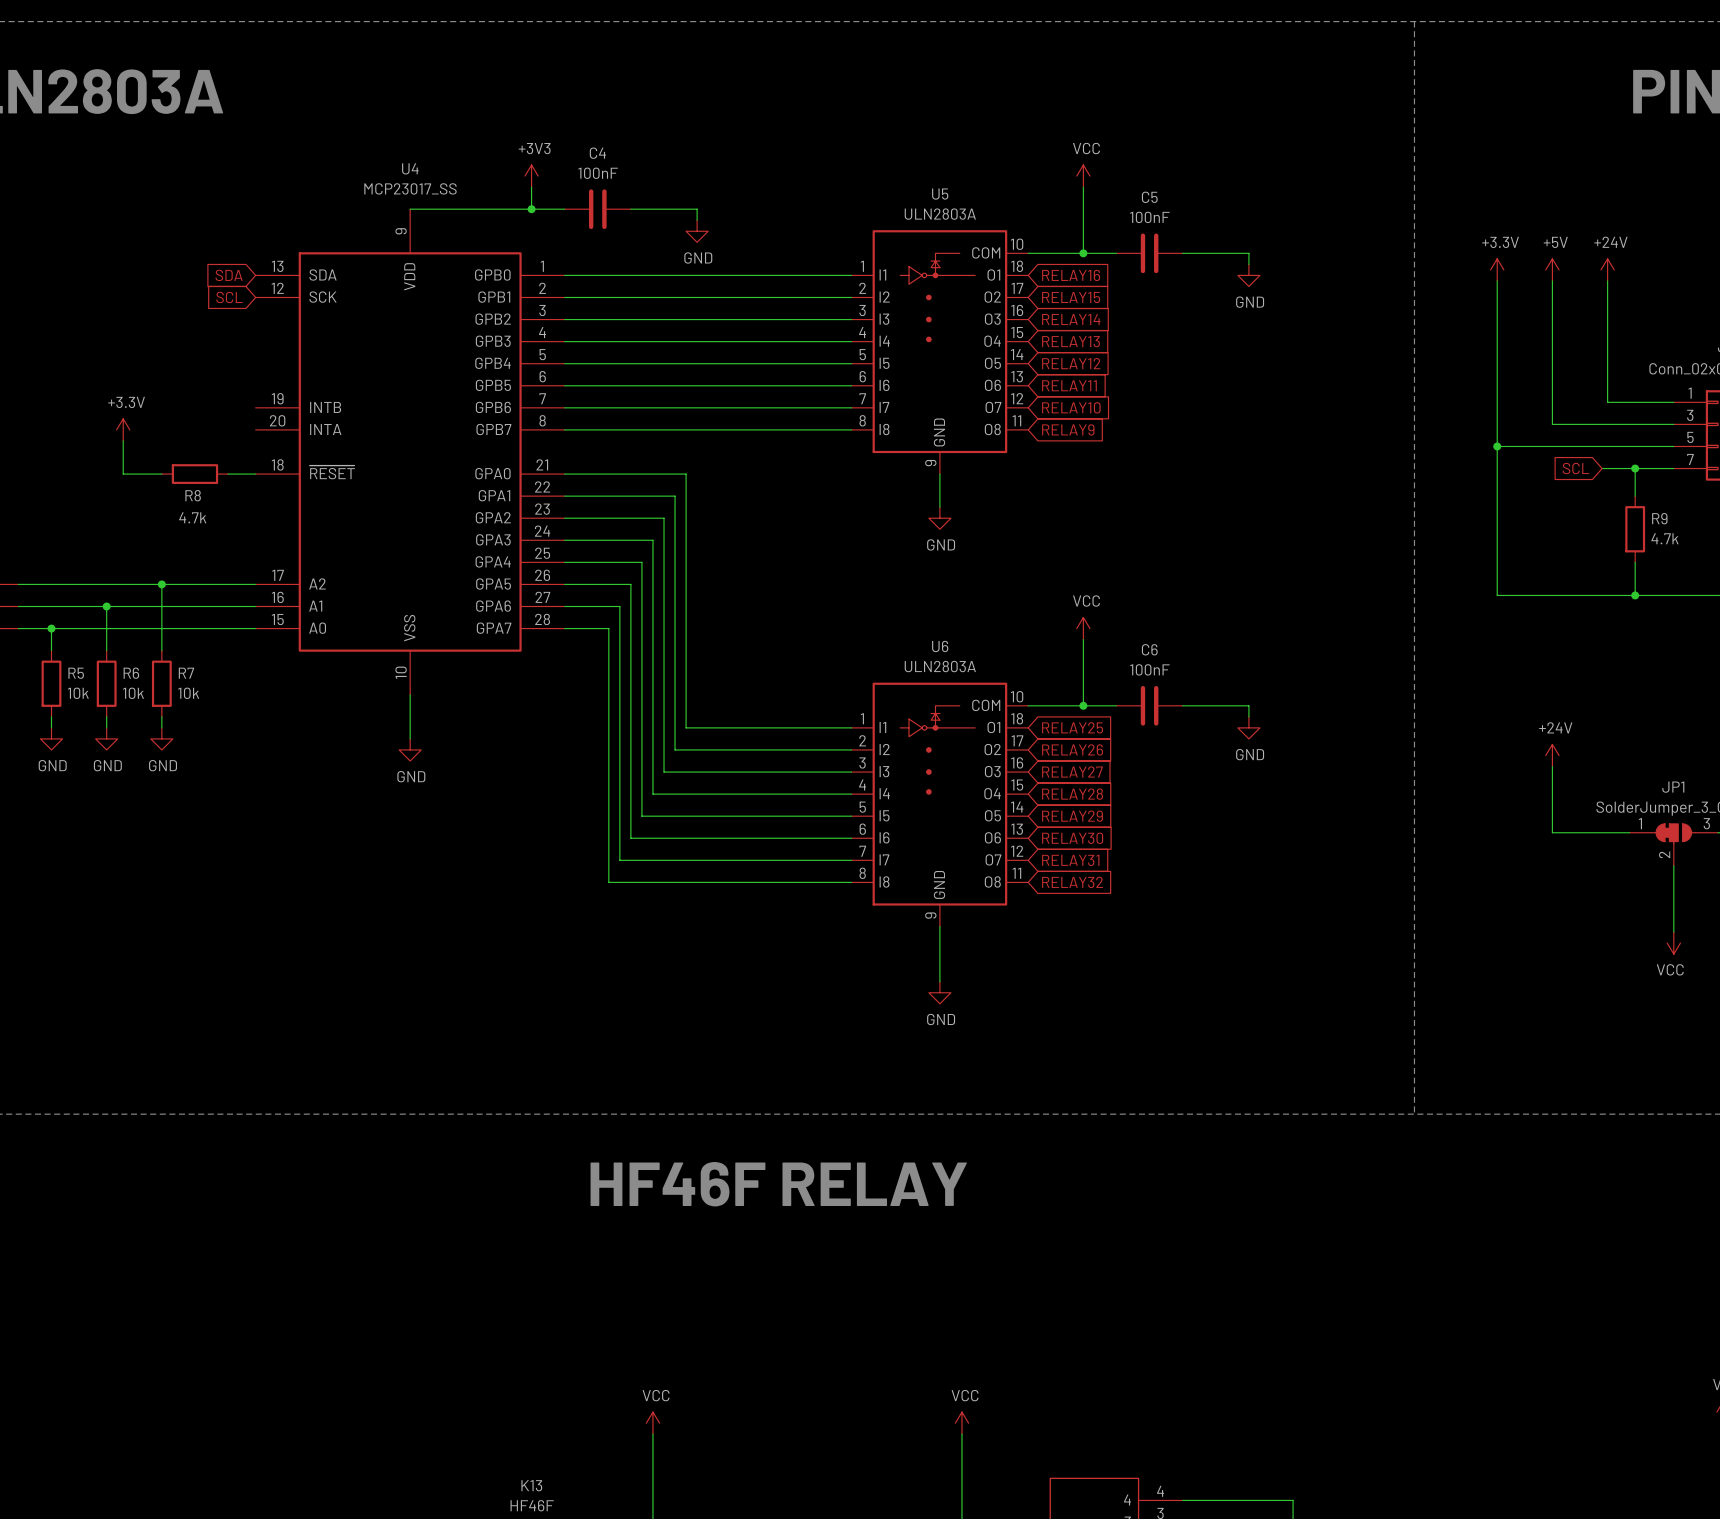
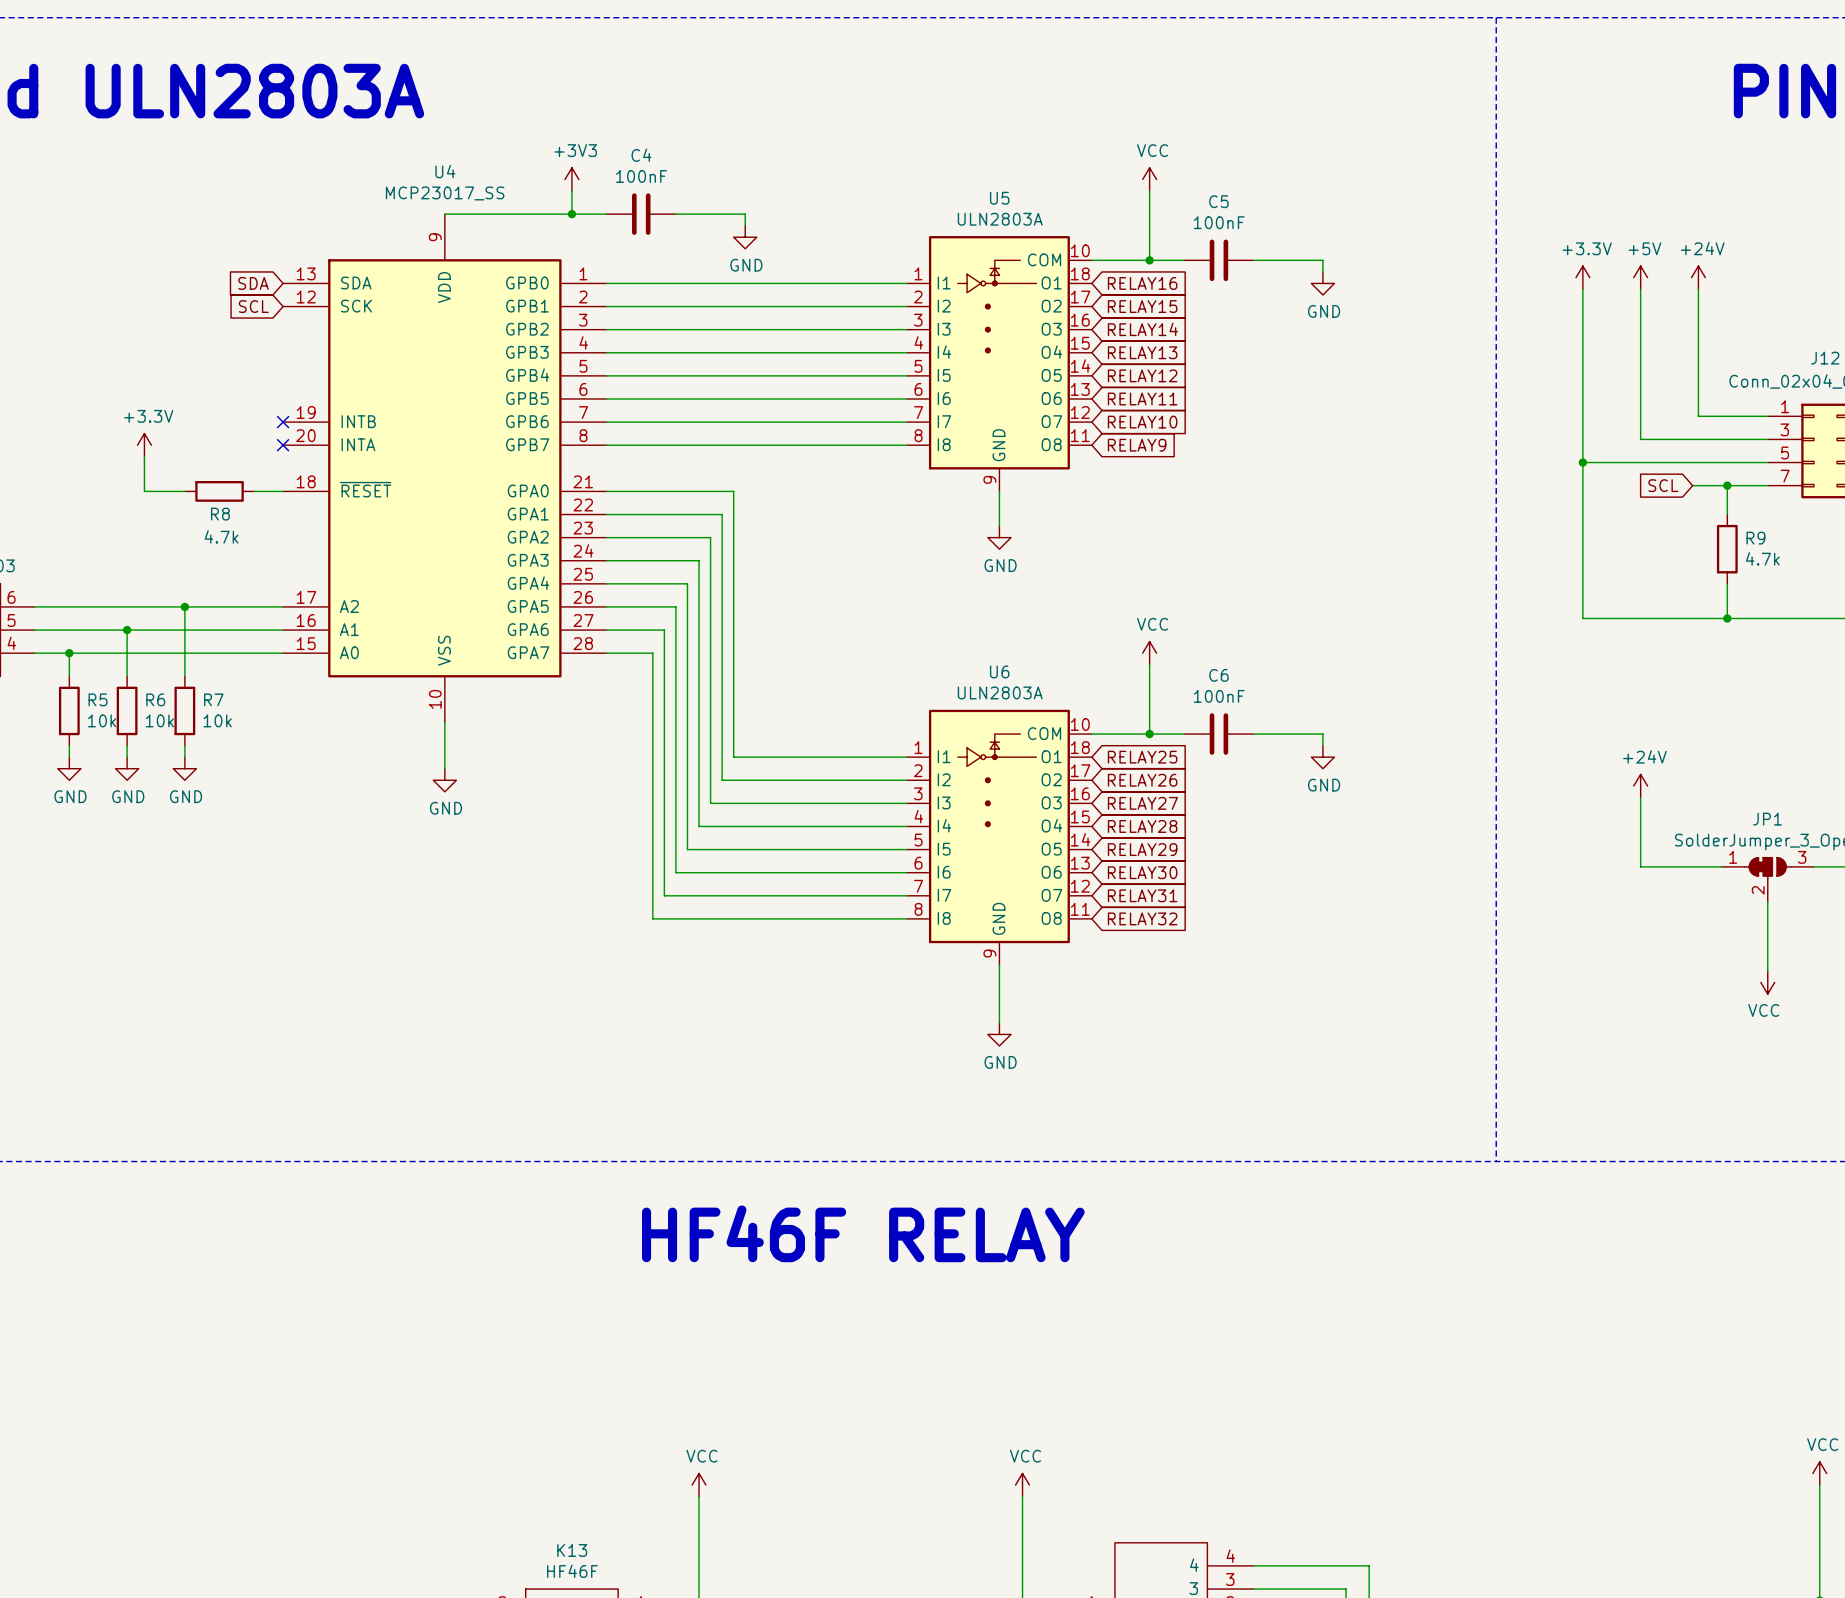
no-connect mark: none -> (283, 422)
no-connect mark: none -> (283, 445)

